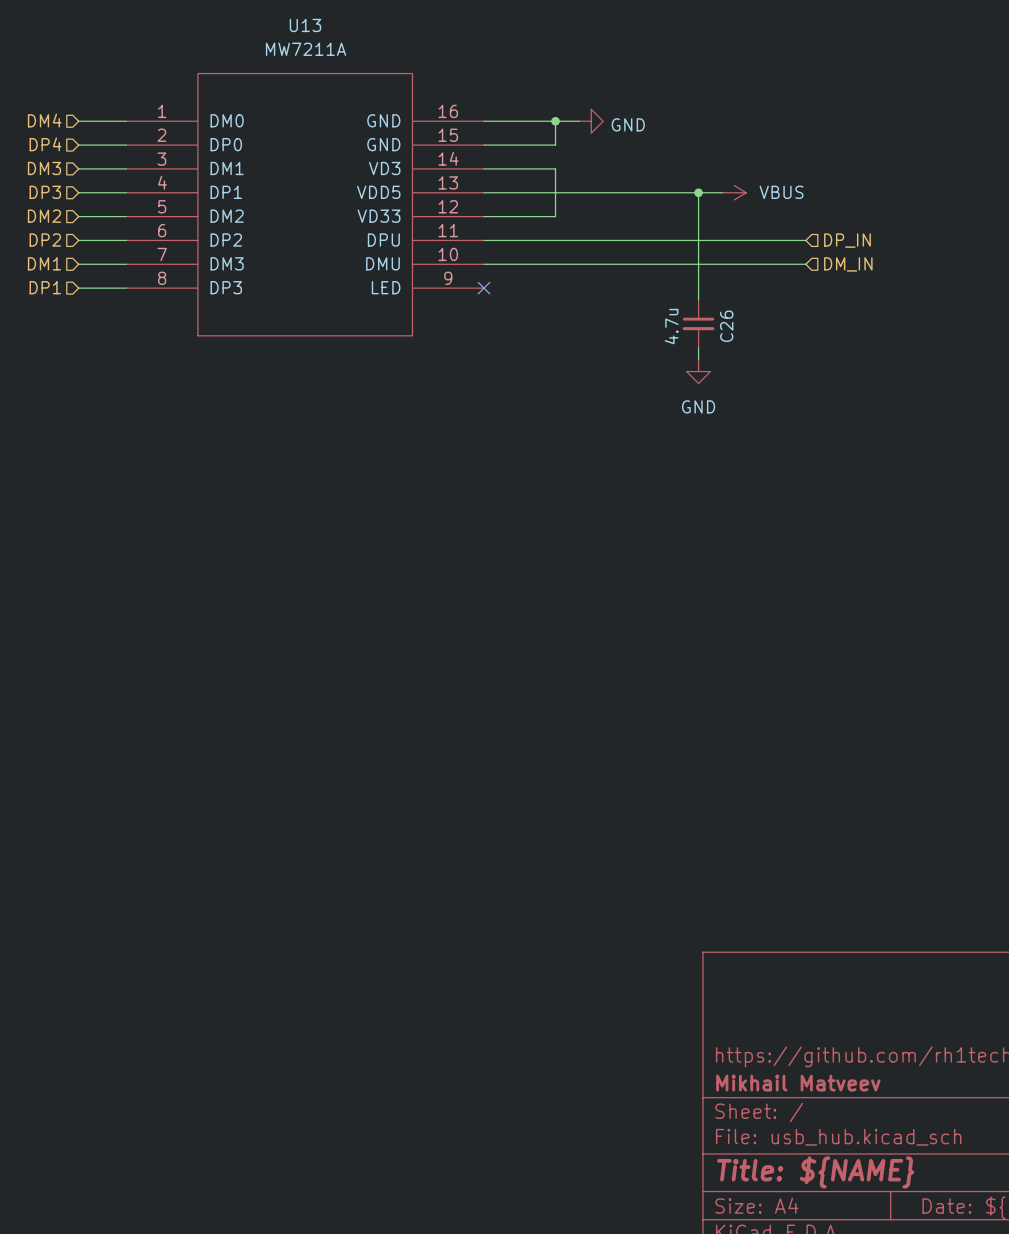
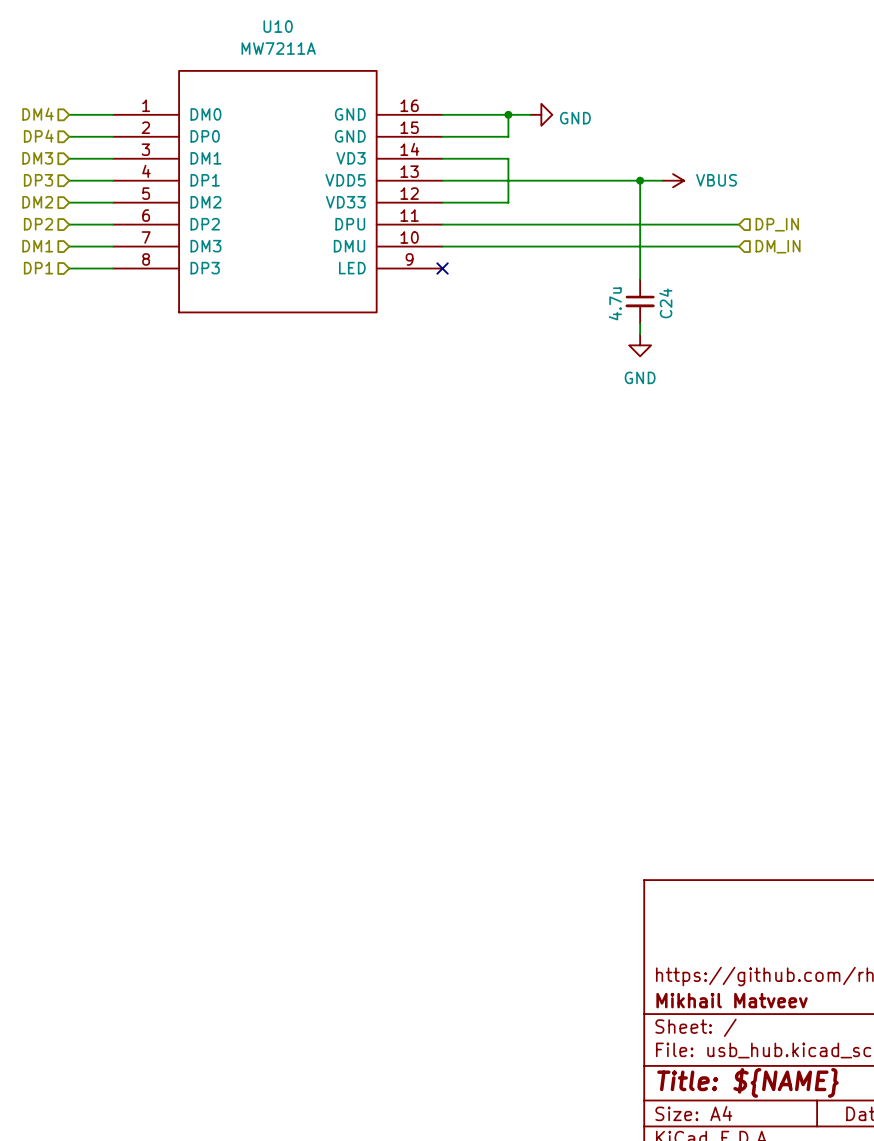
U13 name: U13 (305, 25) -> U10 (278, 26)
C26 name: C26 (726, 326) -> C24 (665, 303)

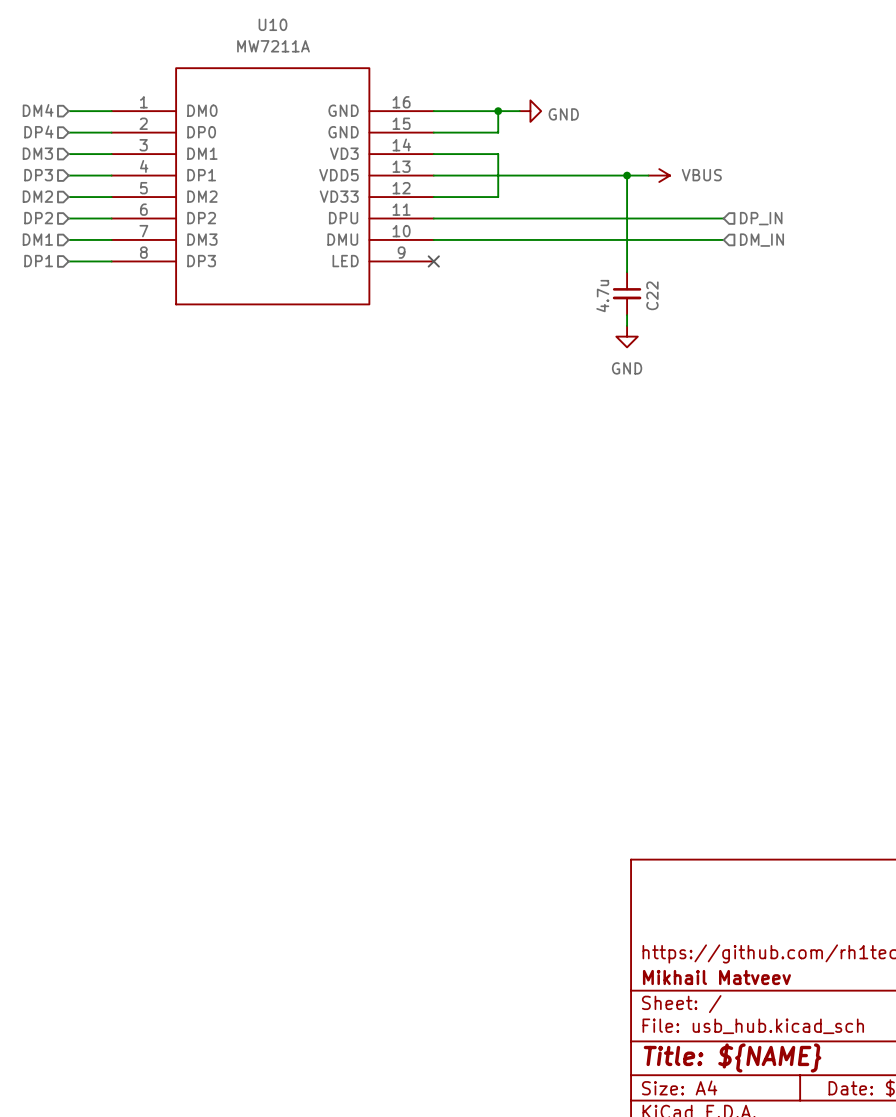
C24 name: C24 (665, 303) -> C22 (652, 295)

